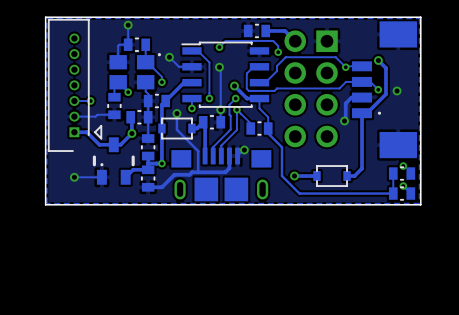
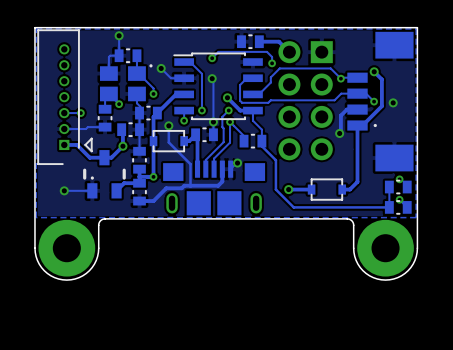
board edge: (114, 204) (45, 204) -> (105, 218) (98, 223) (98, 252) (94, 264) (82, 275) (66, 280) (50, 275) (39, 264) (35, 252) (34, 218)
board edge: (420, 204) (352, 204) -> (417, 218) (417, 252) (413, 264) (401, 275) (385, 280) (369, 275) (357, 264) (353, 252) (353, 223) (347, 218)
part: none -> (66, 248)
part: none -> (385, 248)

